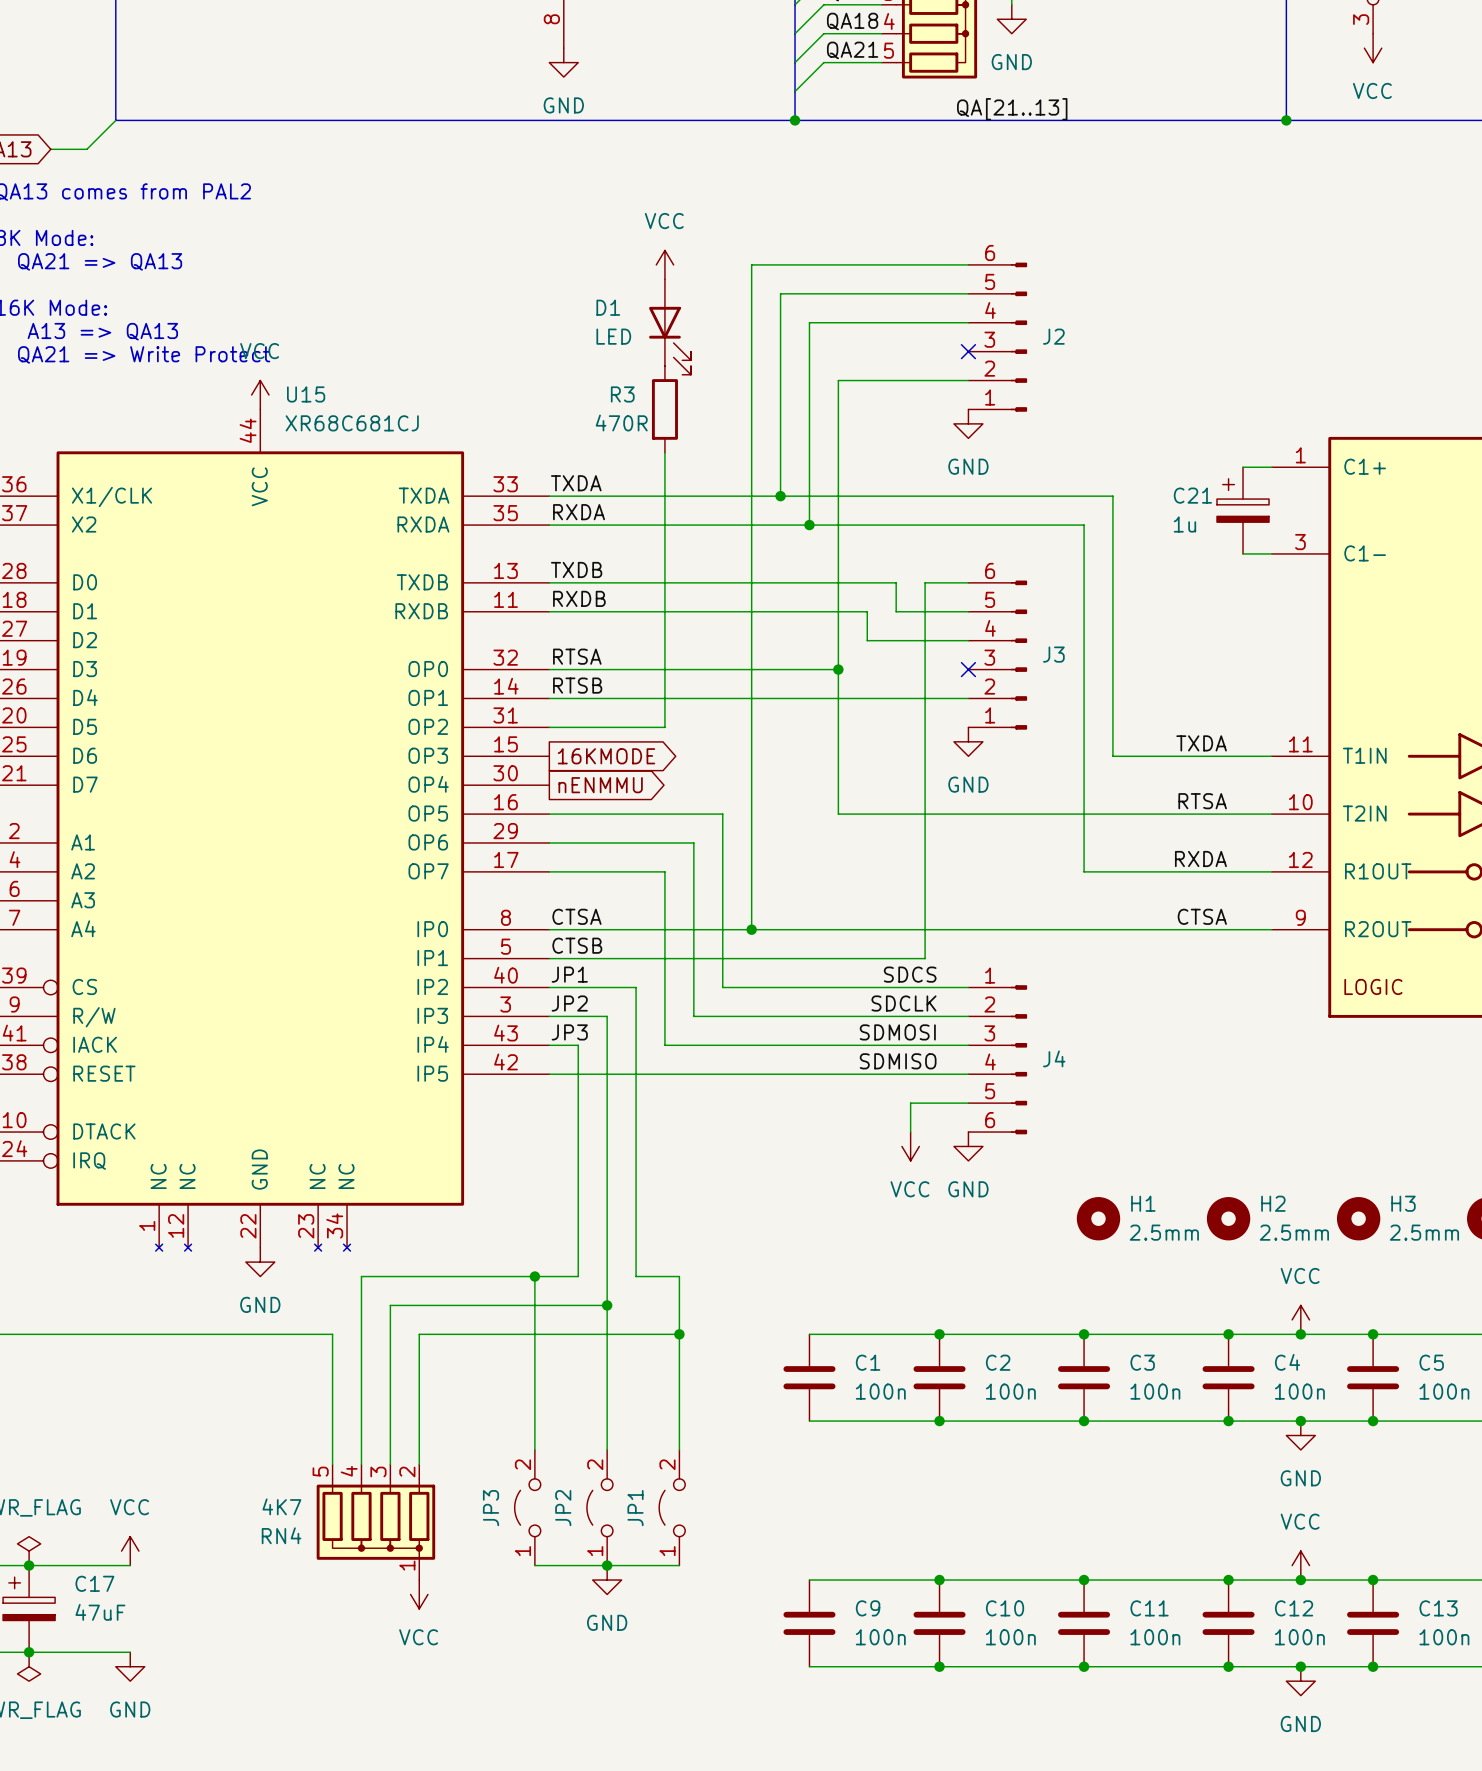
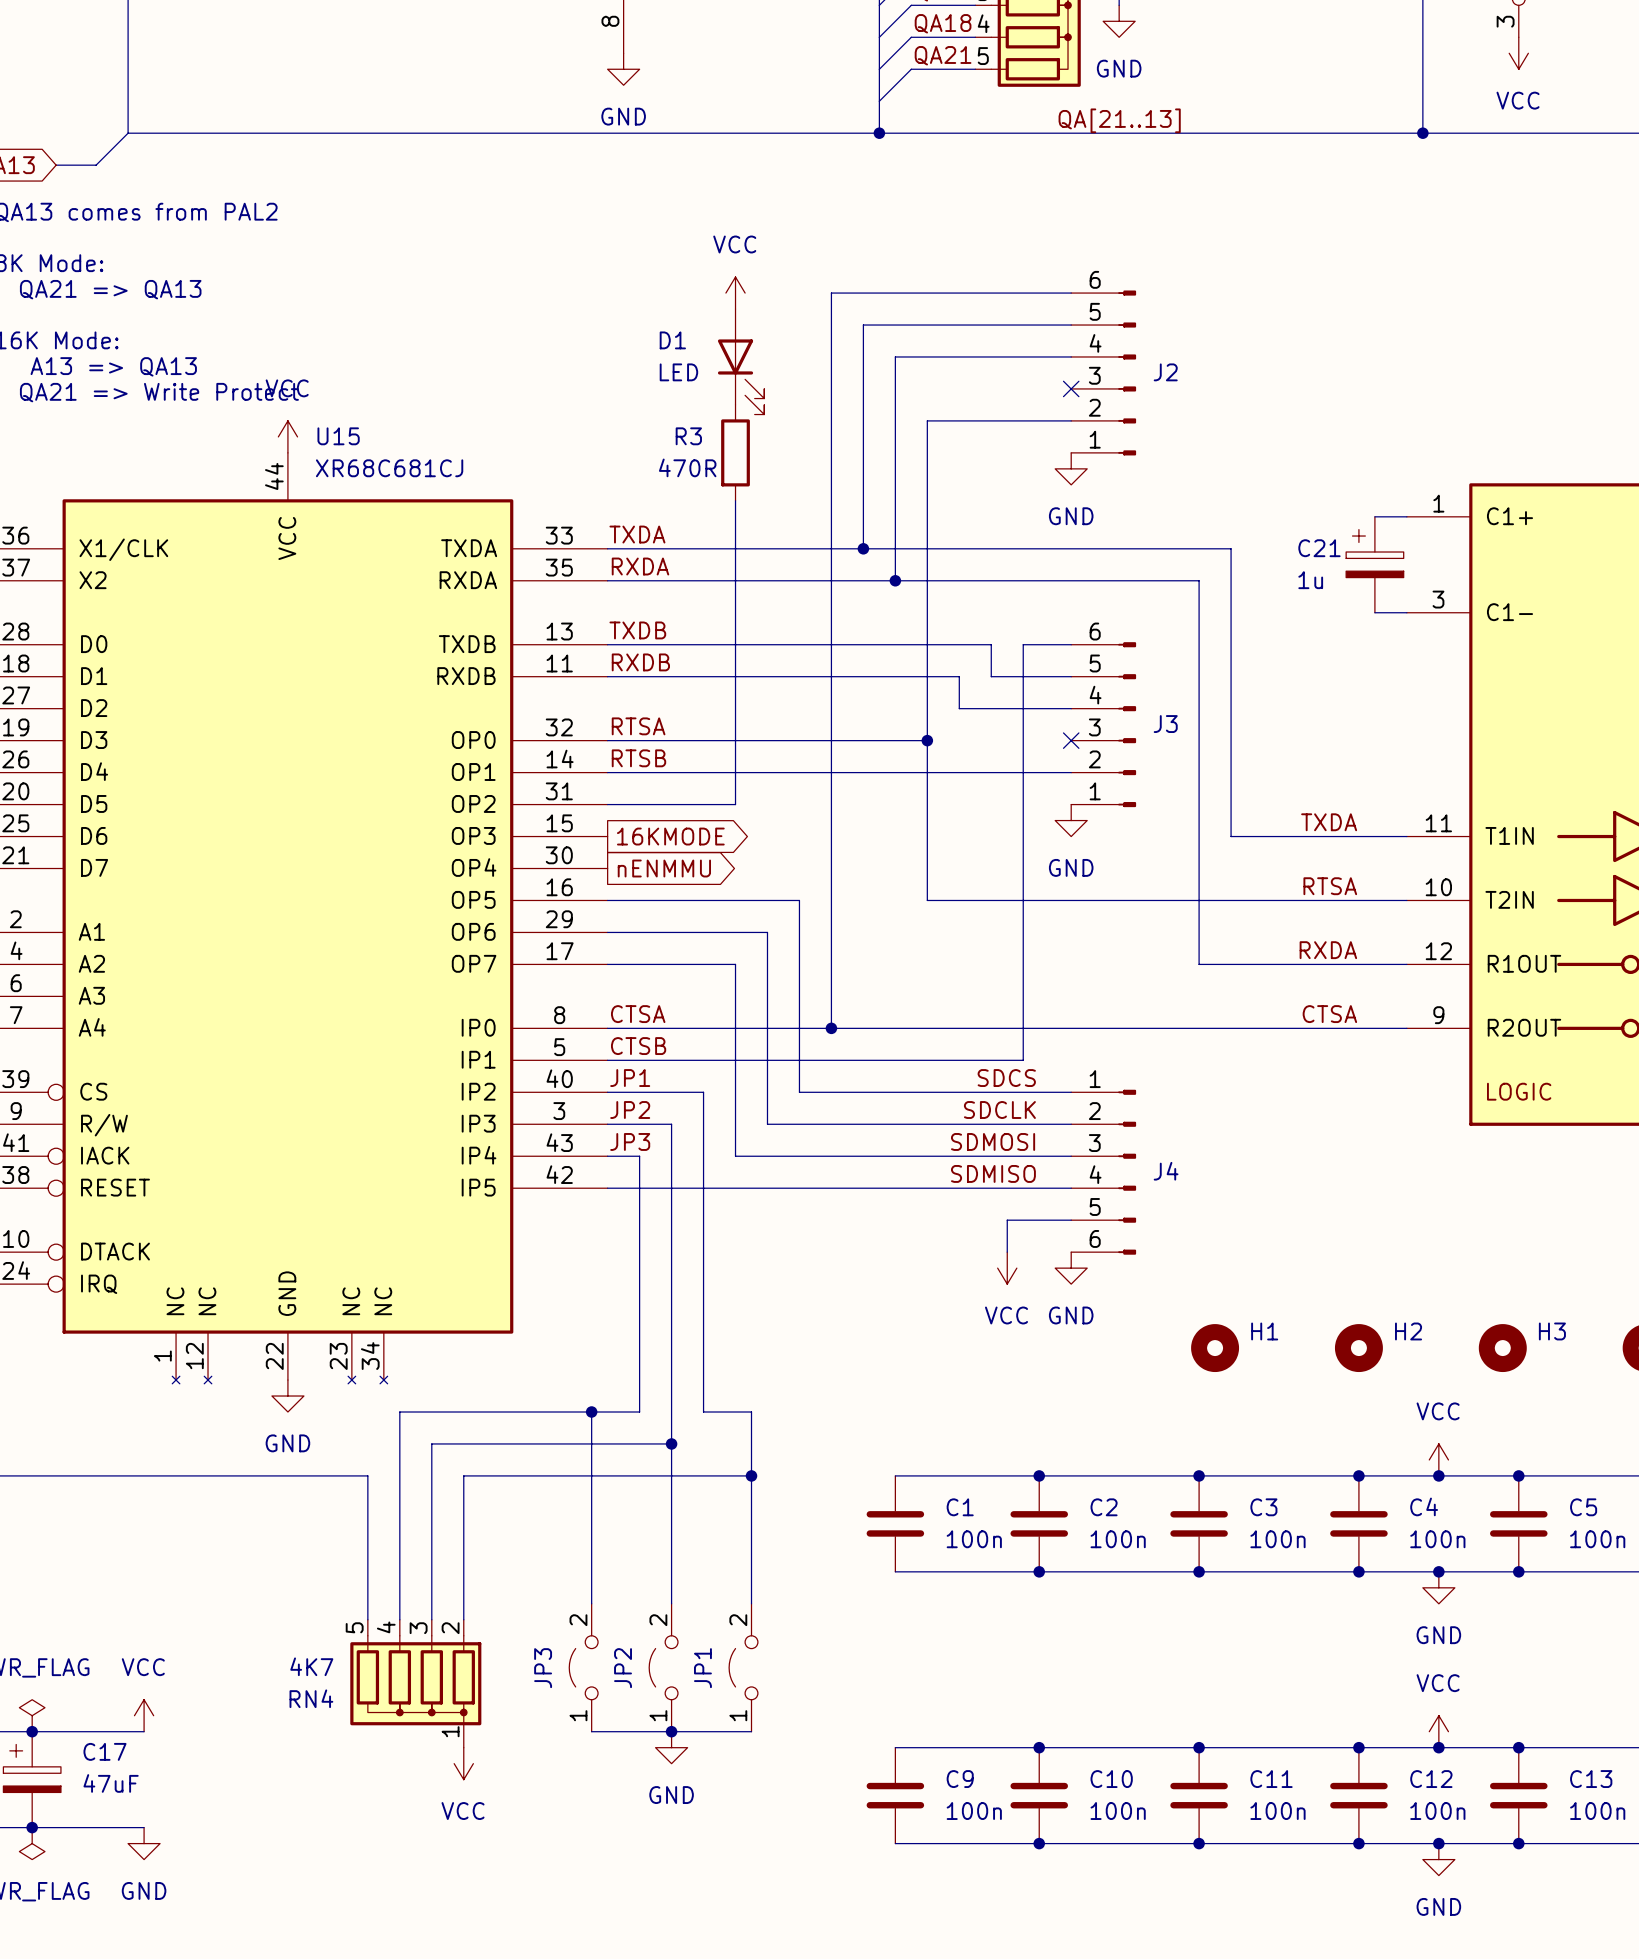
H1 value: 2.5mm (1164, 1232) -> none
H2 value: 2.5mm (1294, 1232) -> none
H3 value: 2.5mm (1424, 1232) -> none

